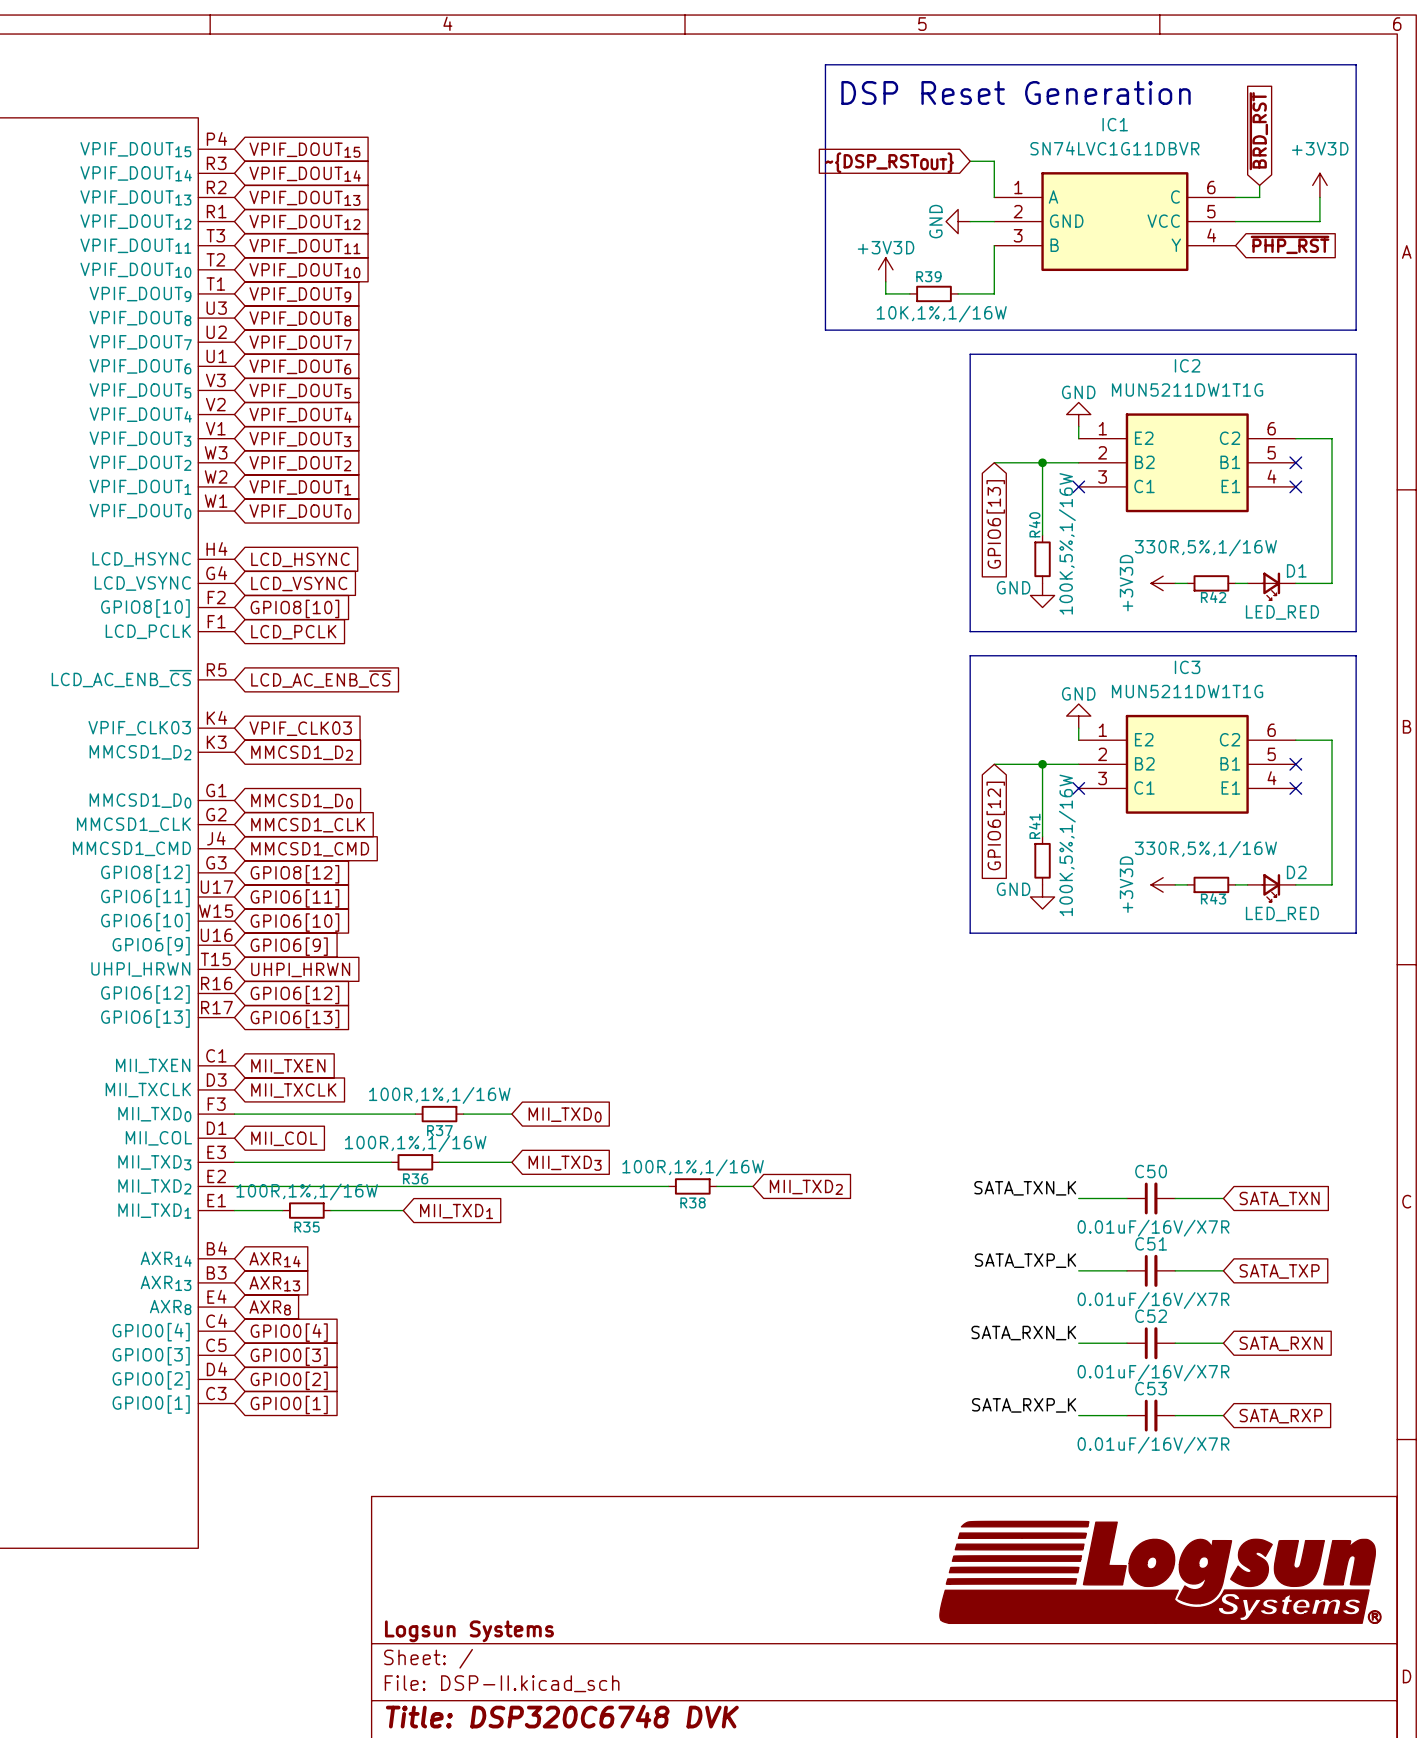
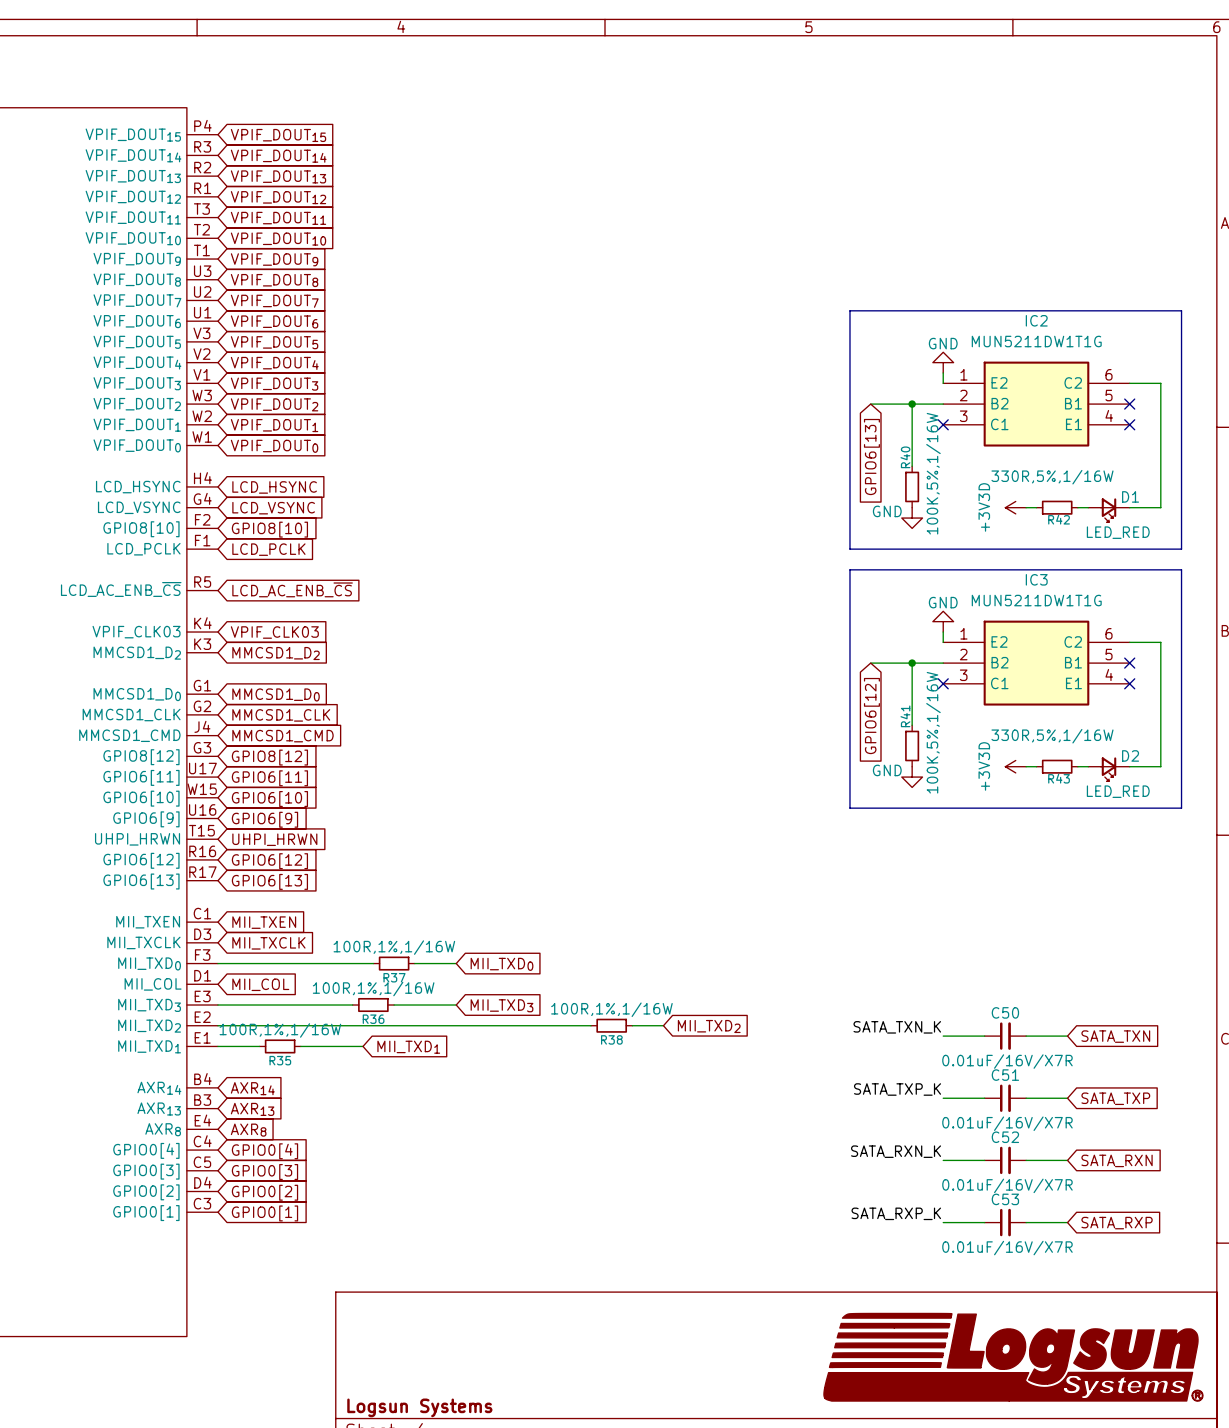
line: (825, 64) (1356, 64) (1356, 330) (825, 330) (825, 64) -> none
text: DSP Reset Generation (1016, 92) -> none
global label: ~{BRD_RST} (1258, 131) -> none
wire: (970, 161) (994, 161) (994, 197) -> none
global label: ~{DSP_RSTOUT} (889, 162) -> none
wire: (1259, 185) (1259, 197) (1235, 197) -> none
power symbol: +3V3D (1319, 185) -> none
wire: (1319, 197) (1319, 221) (1235, 221) -> none
power symbol: GND (958, 221) -> none
wire: (970, 221) (994, 221) -> none
IC1: SN74LVC1G11DBVR (1114, 221) -> none
global label: ~{PHP_RST} (1290, 244) -> none
wire: (994, 245) (994, 293) (958, 293) -> none
power symbol: +3V3D (885, 269) -> none
wire: (885, 281) (885, 293) (909, 293) -> none
R39: 10K,1%,1/16W (934, 293) -> none

